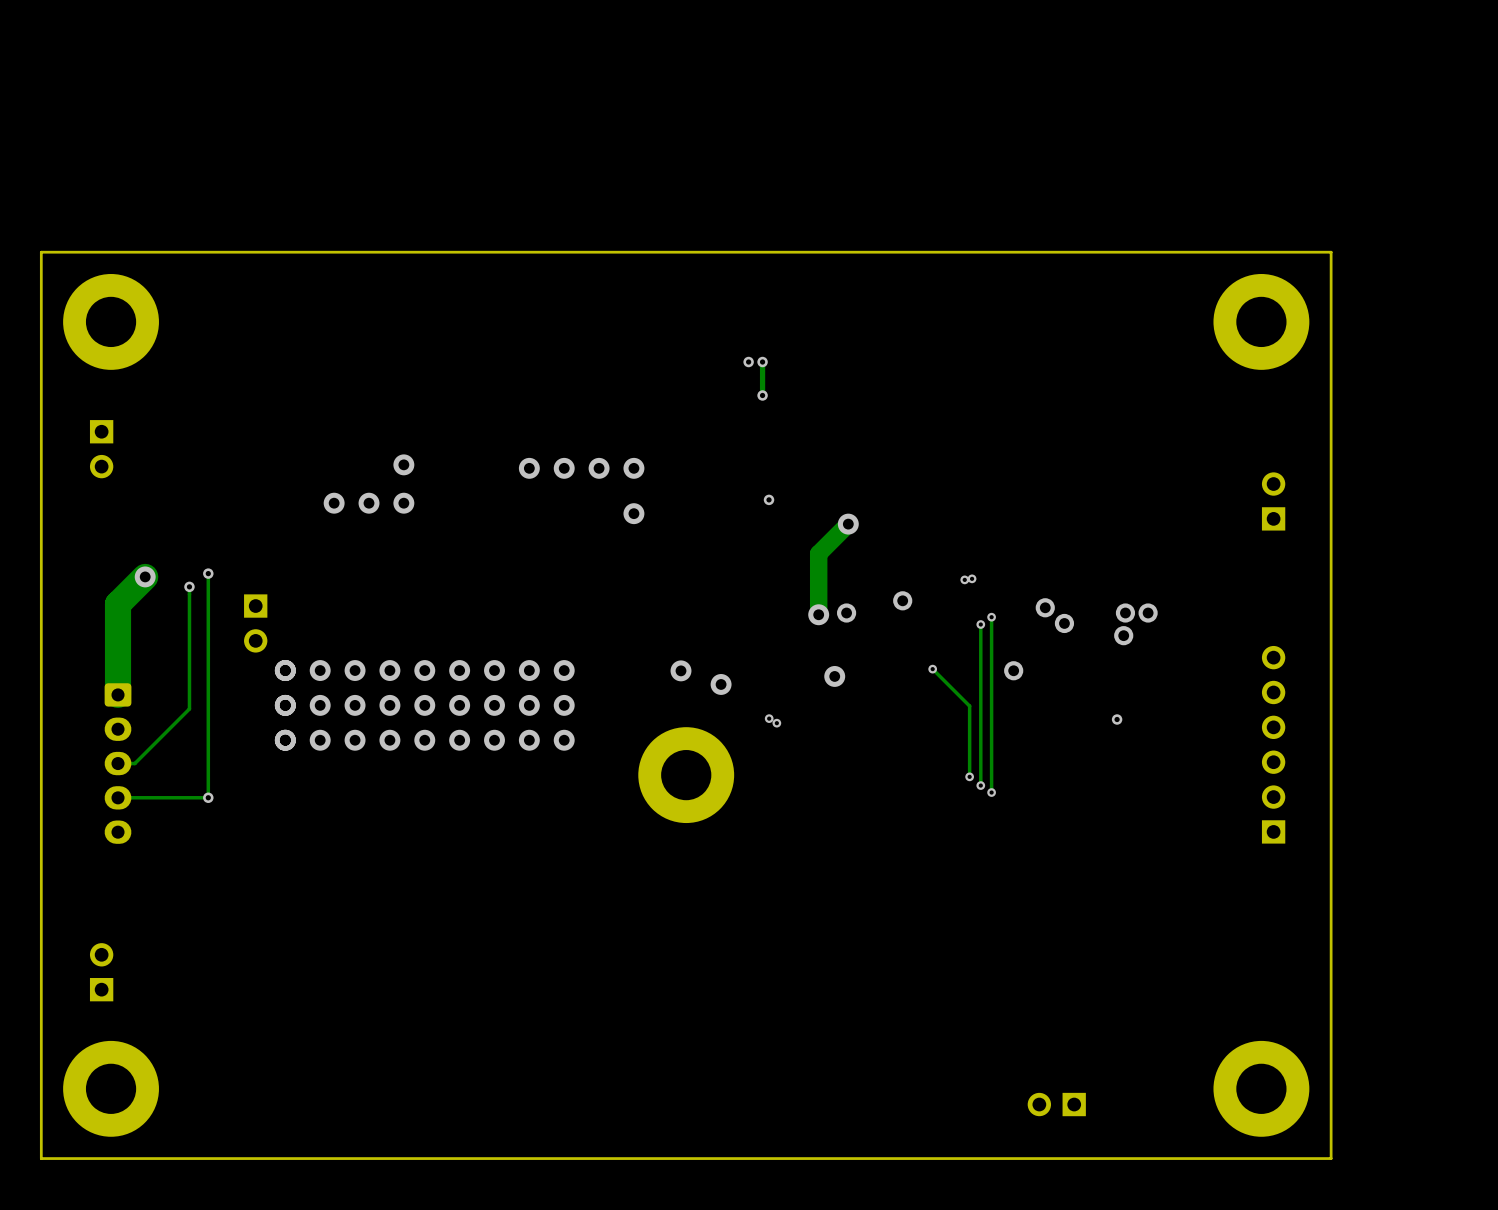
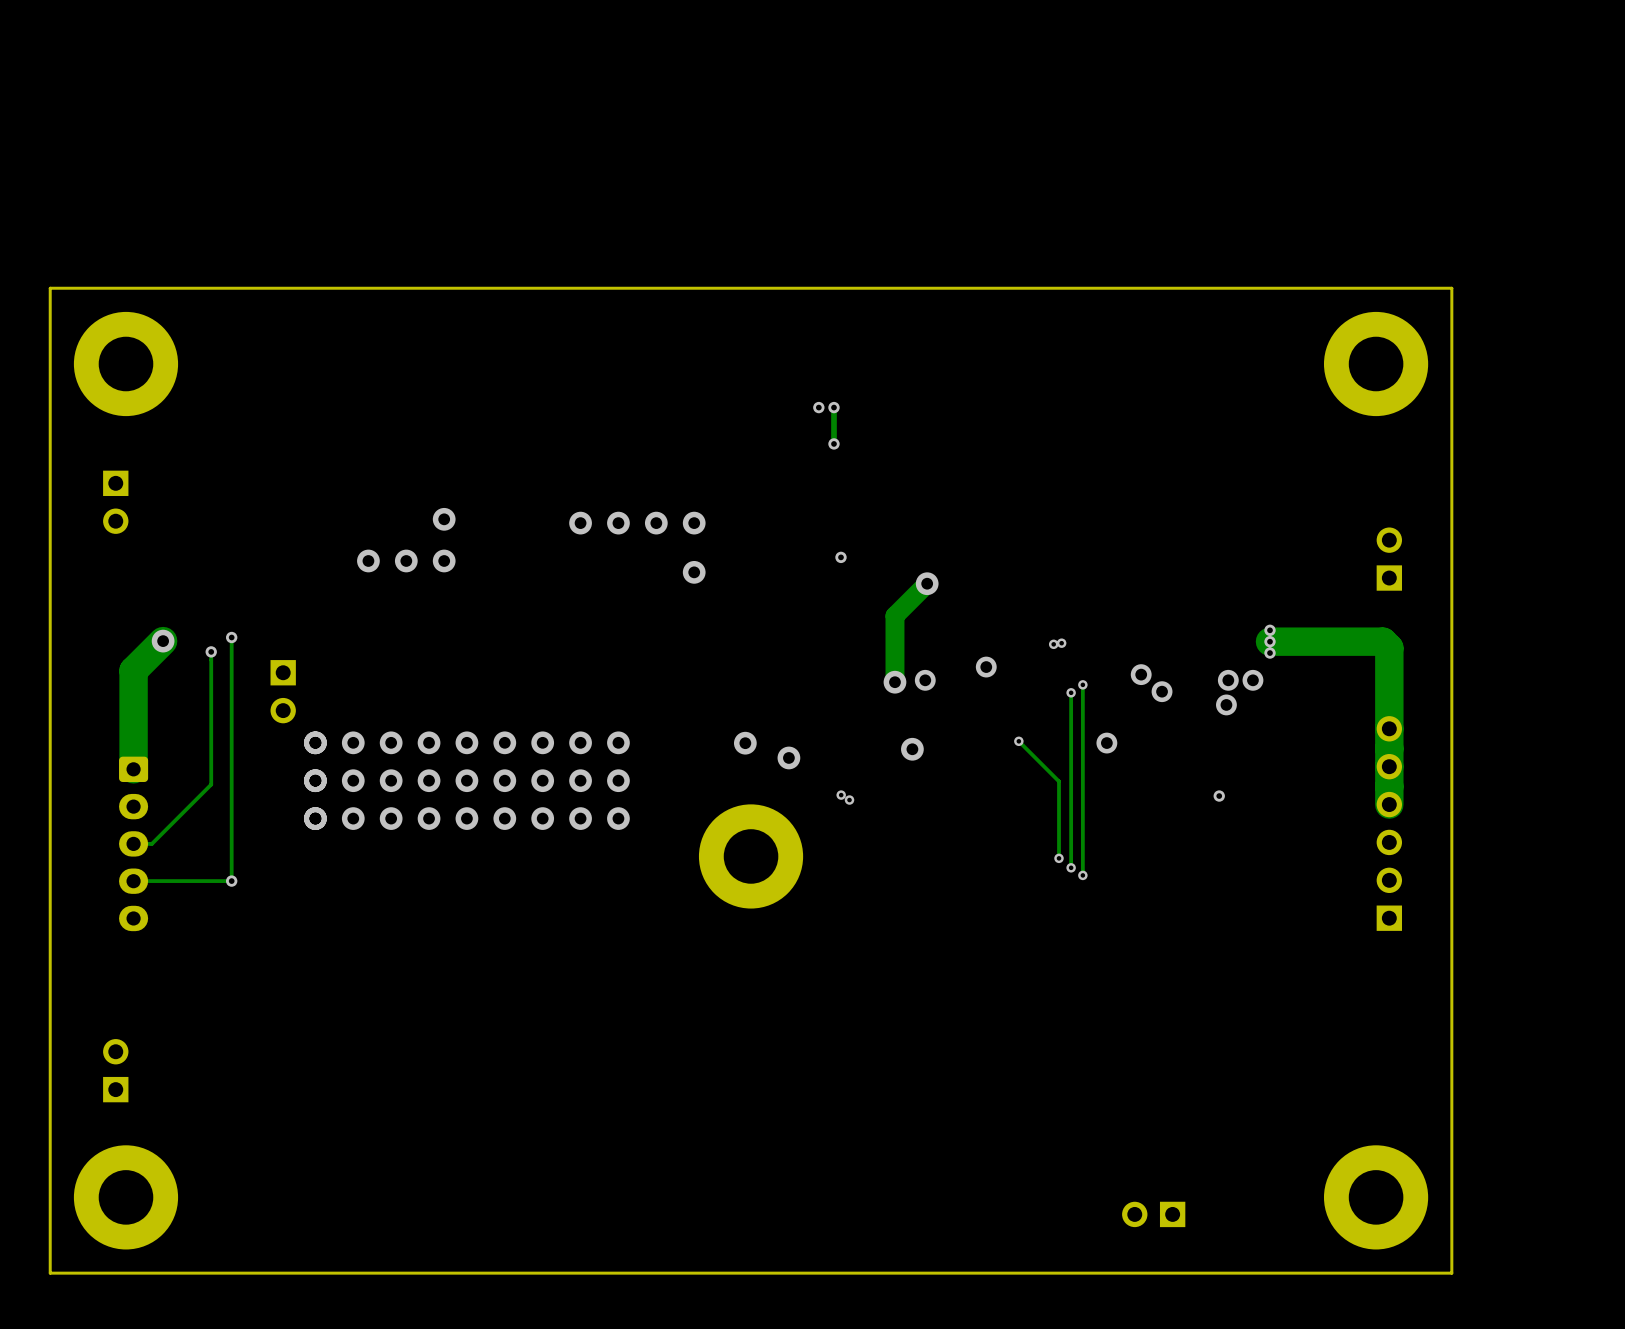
via: none -> (1270, 630)
track: none -> (1270, 641) (1382, 641) (1389, 648) (1389, 804)
via: none -> (1270, 641)
via: none -> (1270, 653)

